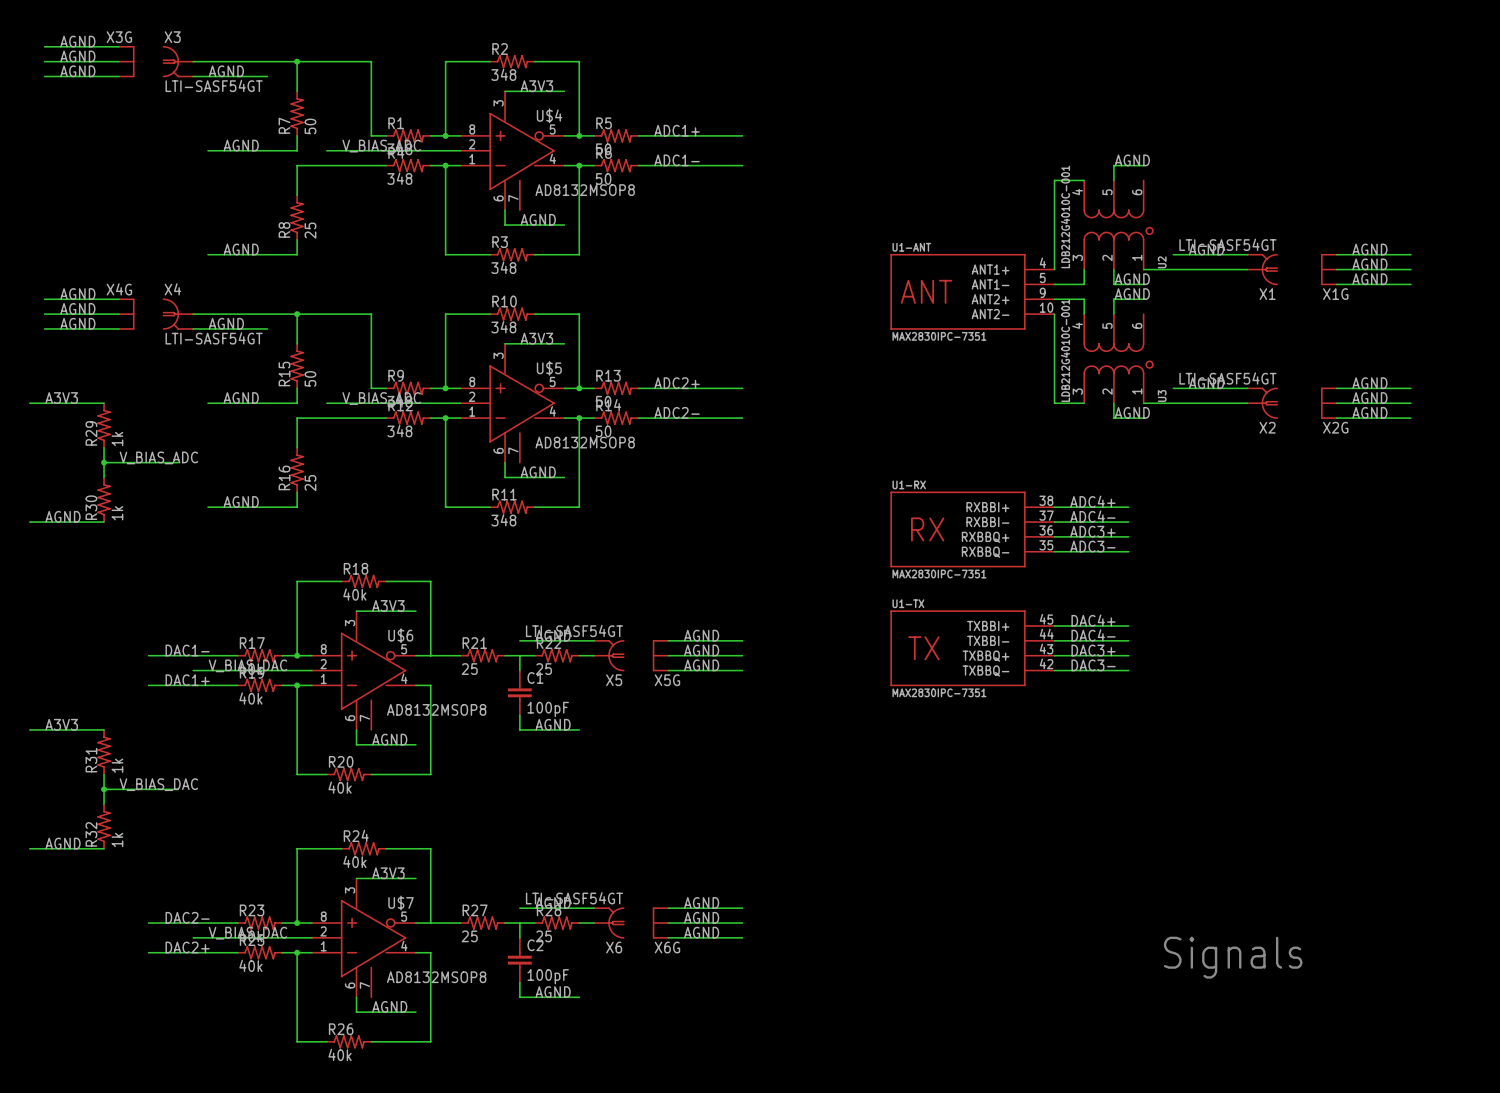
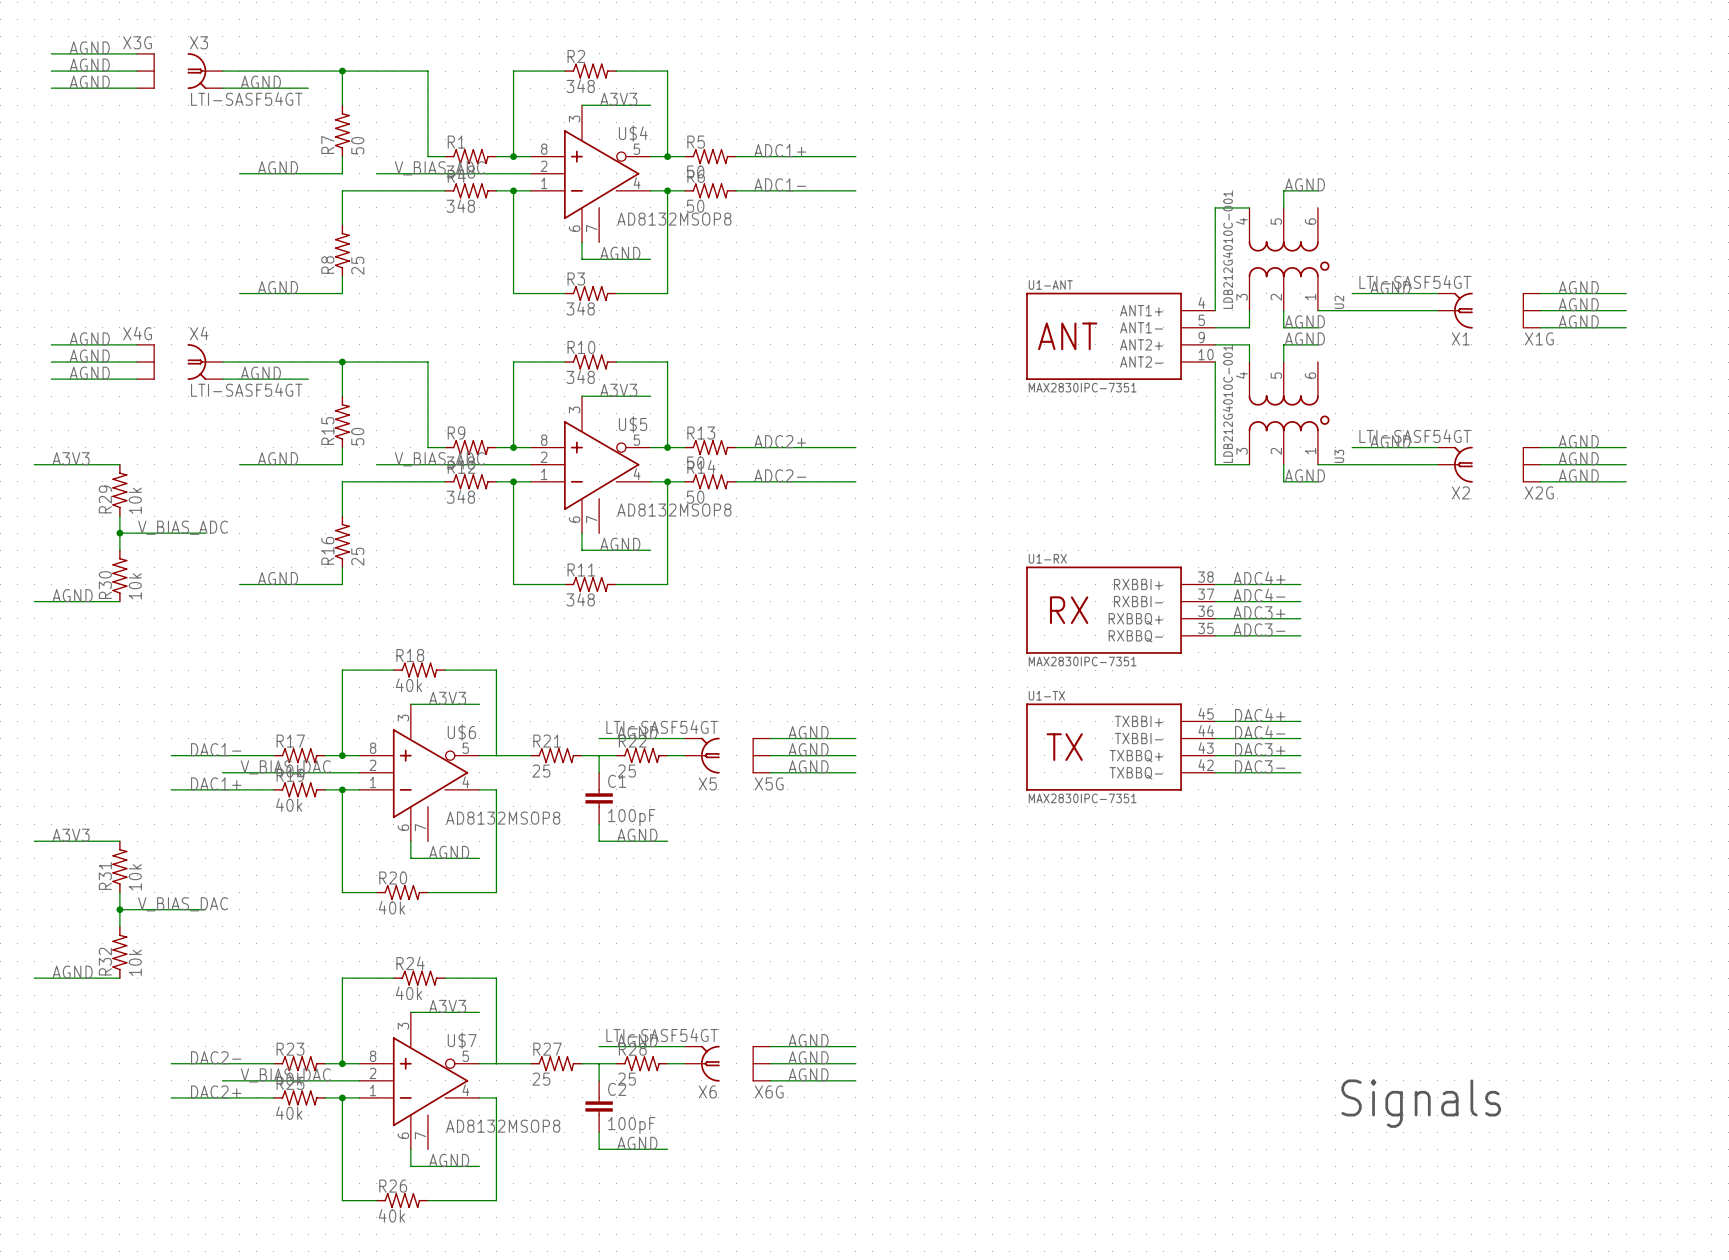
R29 value: 1k (117, 438) -> 10k (135, 500)
R30 value: 1k (117, 513) -> 10k (135, 586)
R31 value: 1k (117, 765) -> 10k (135, 877)
R32 value: 1k (117, 839) -> 10k (135, 962)

